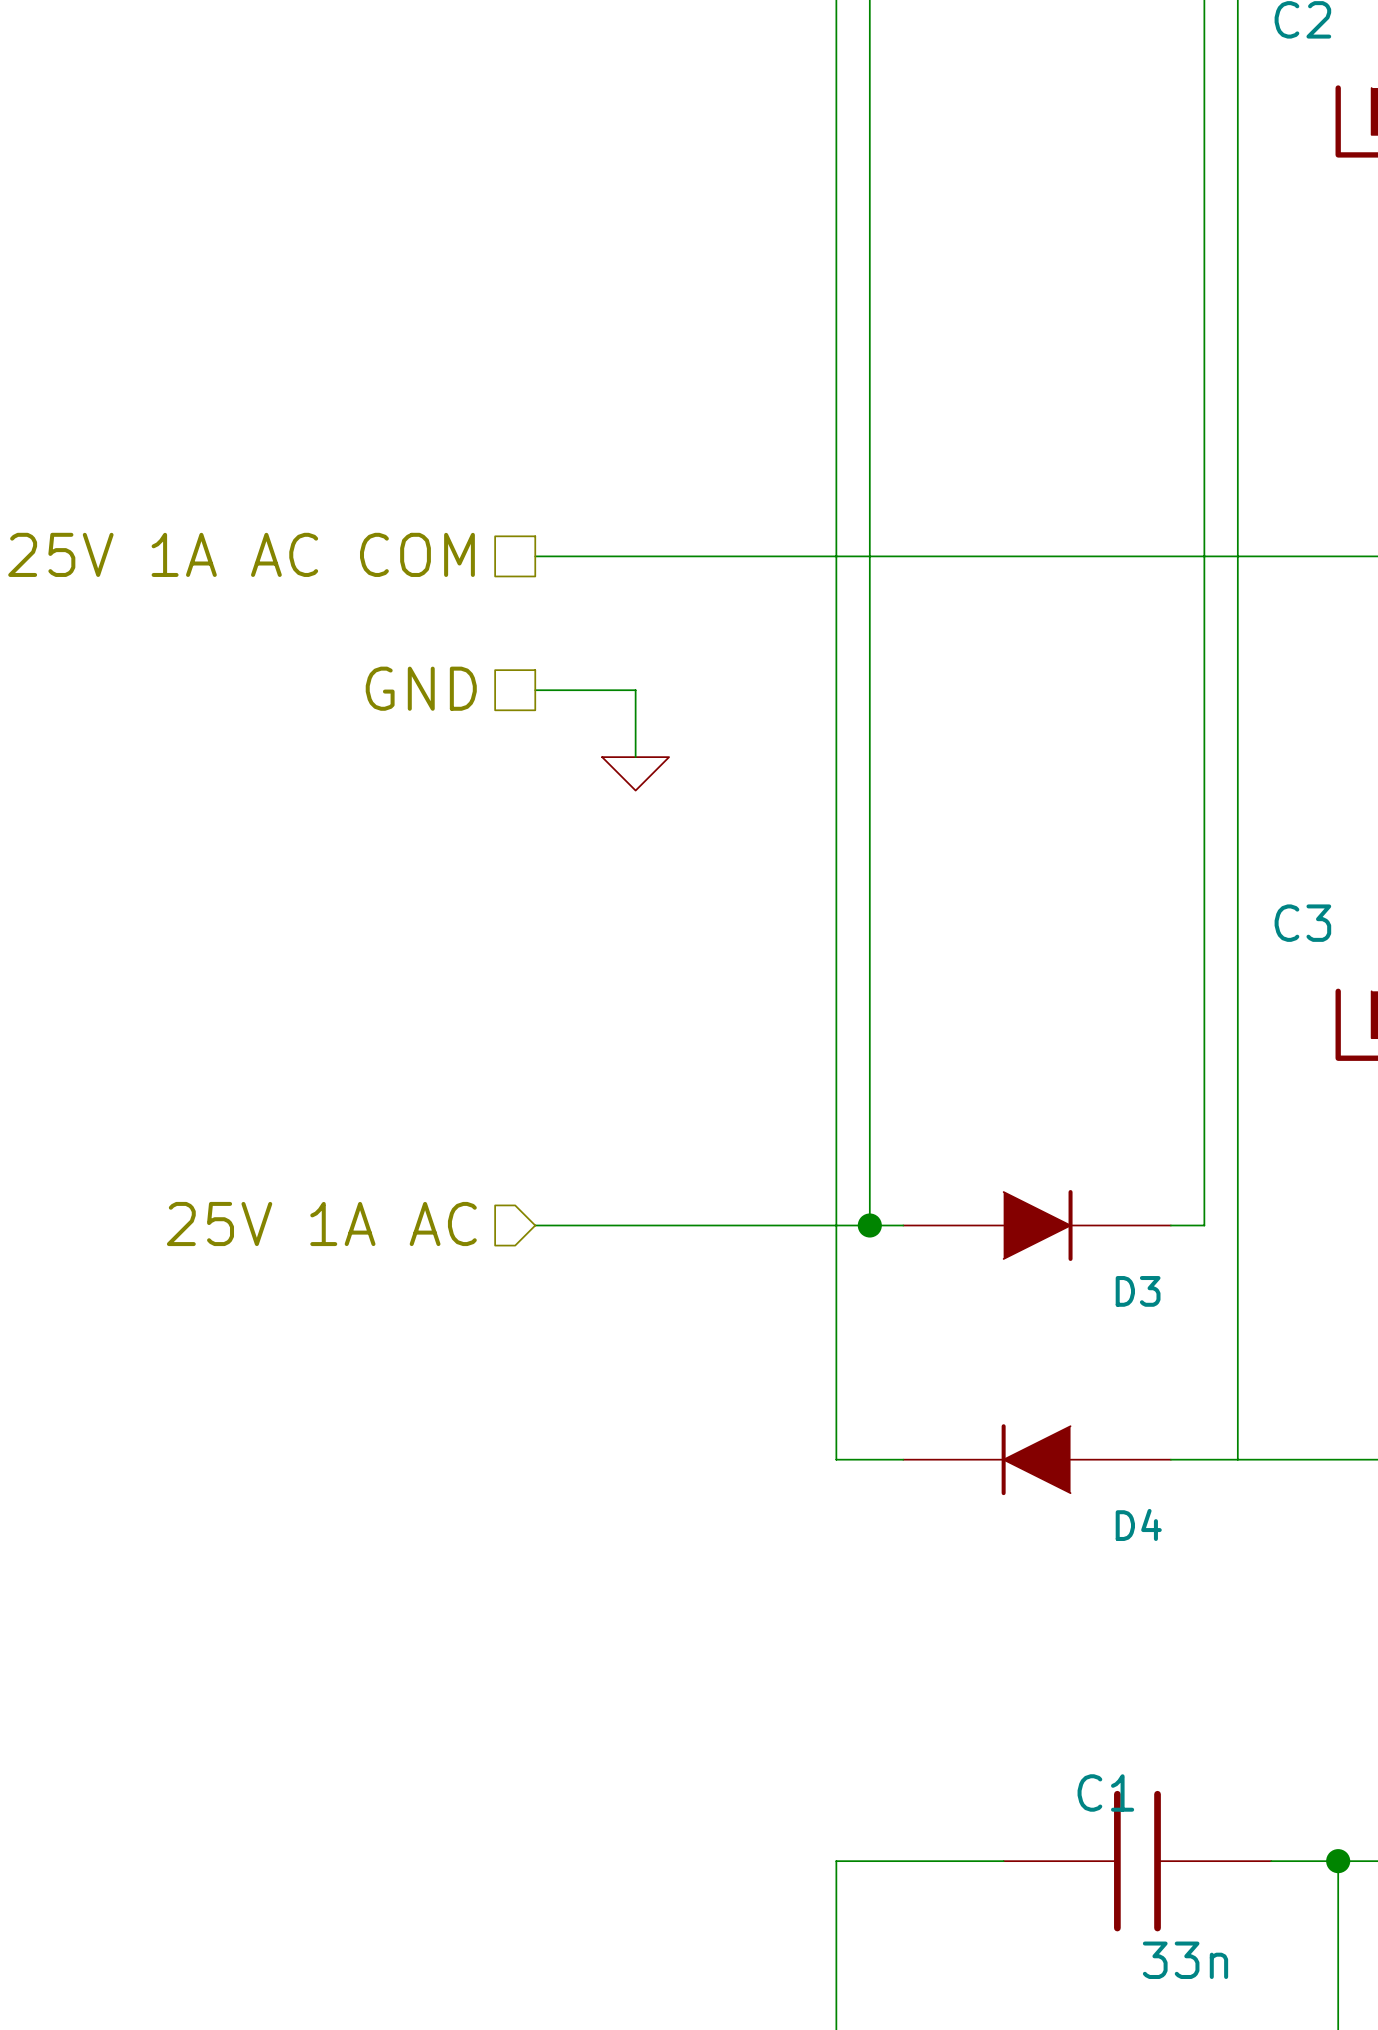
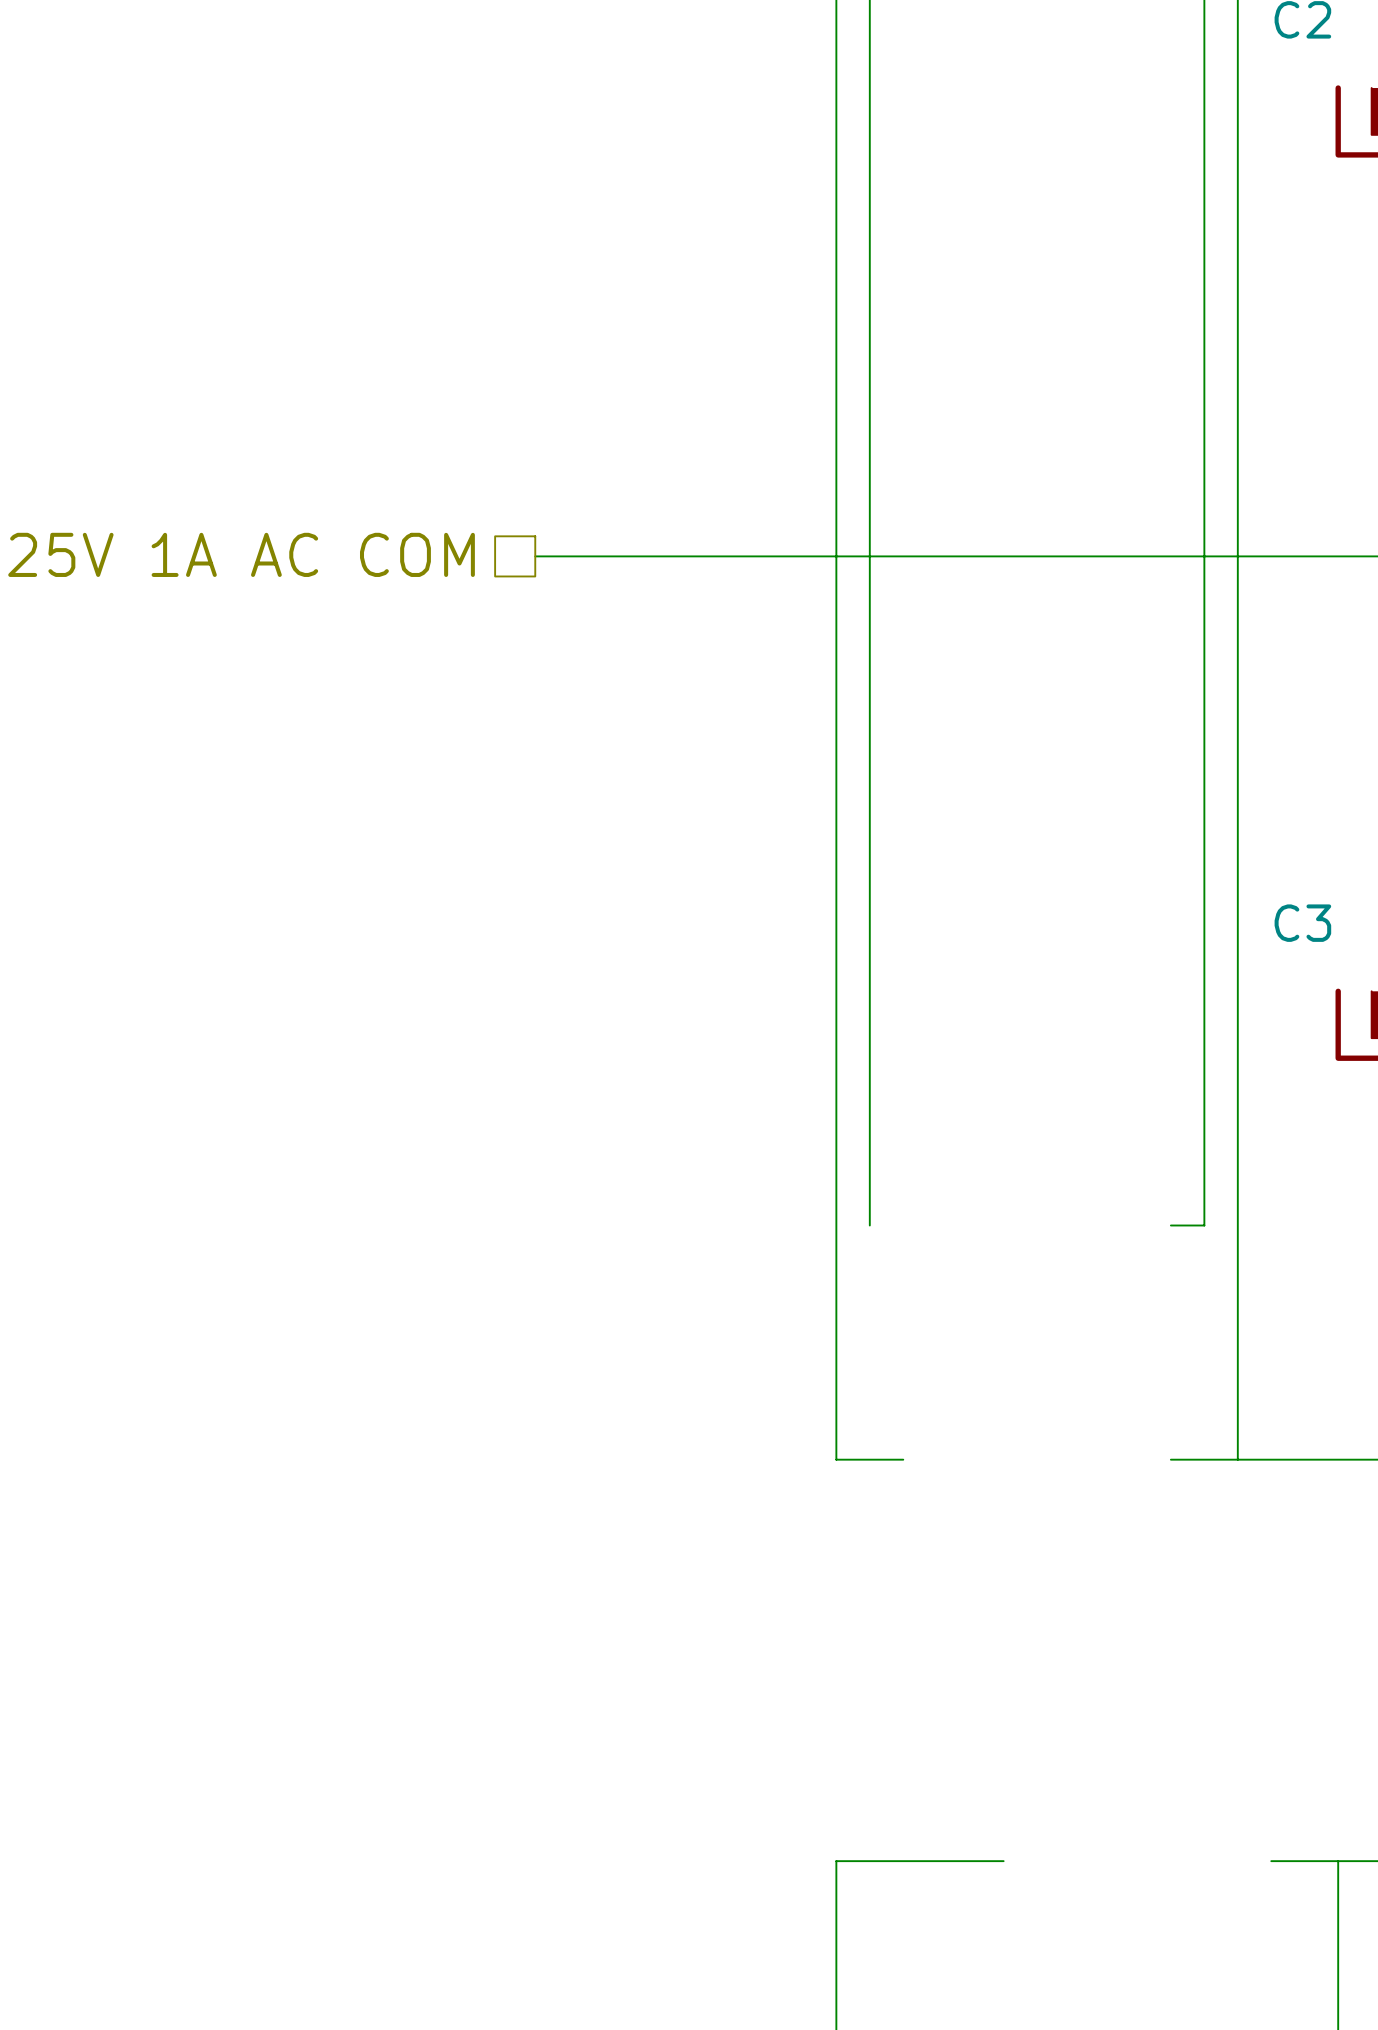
hierarchical label: GND (421, 688) -> none
wire: (535, 690) (635, 690) (635, 757) -> none
power symbol: (635, 773) -> none
hierarchical label: 25V 1A AC (321, 1223) -> none
wire: (535, 1225) (903, 1225) -> none
junction: (869, 1225) -> none
D3: (1037, 1225) -> none
D4: (1037, 1459) -> none
C1: 33n (1137, 1861) -> none
junction: (1338, 1861) -> none

